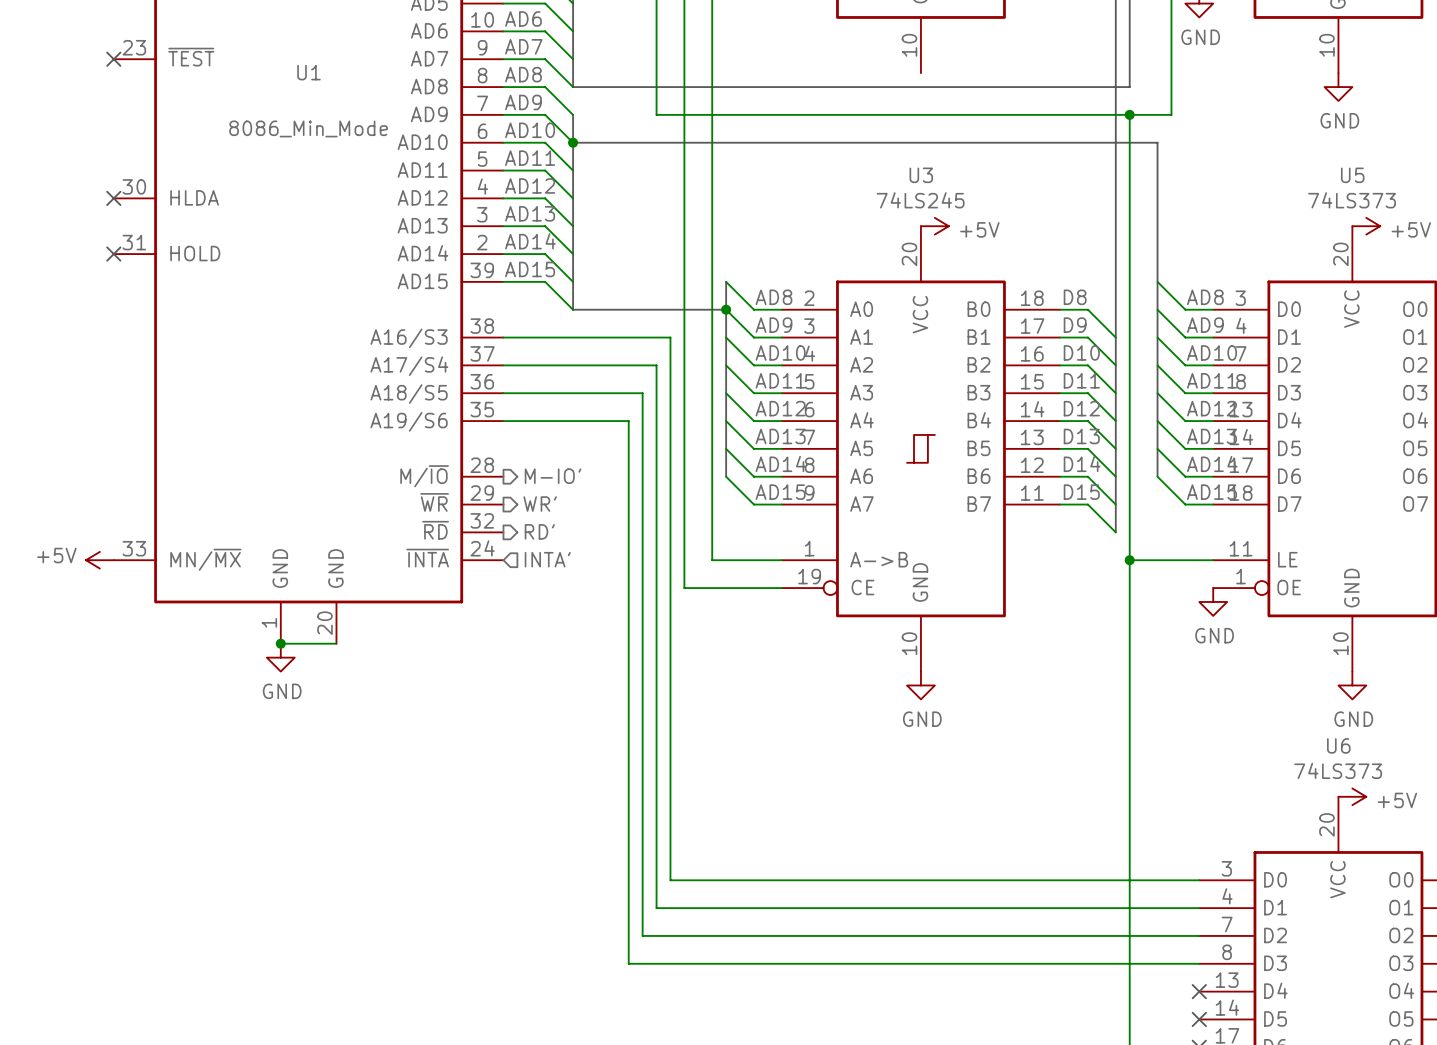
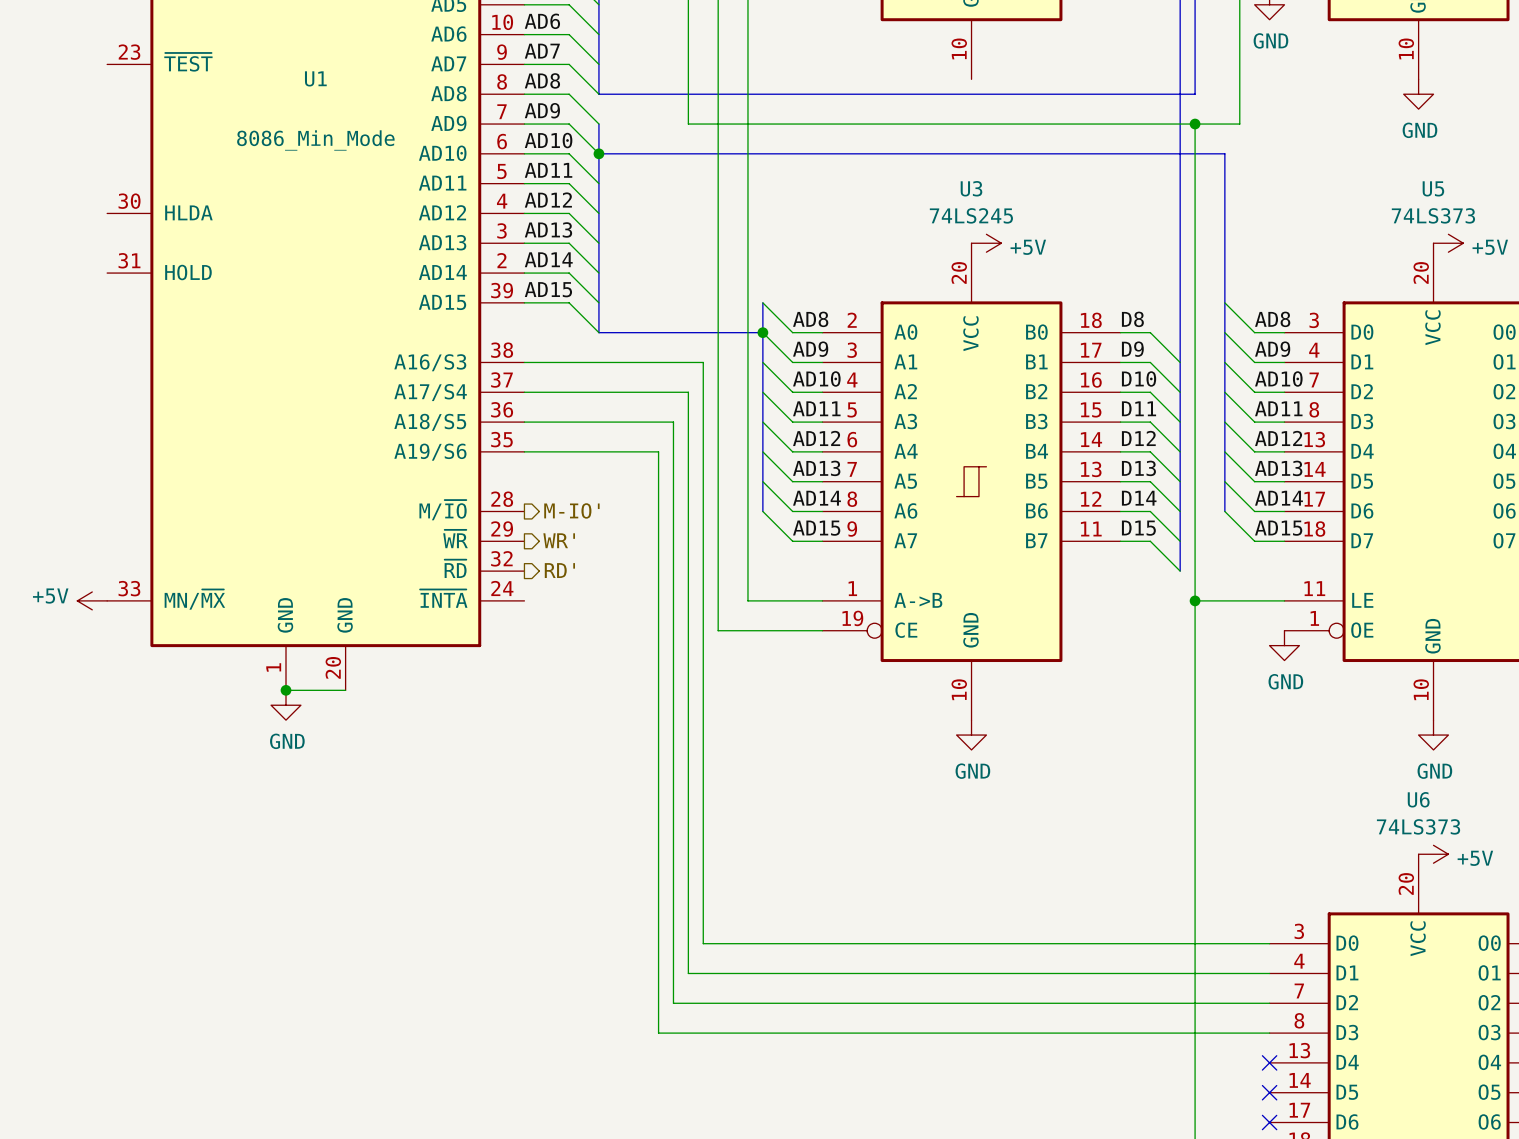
no-connect mark: (113, 59) -> none
no-connect mark: (113, 198) -> none
no-connect mark: (113, 254) -> none
hierarchical label: INTA' (547, 559) -> none

